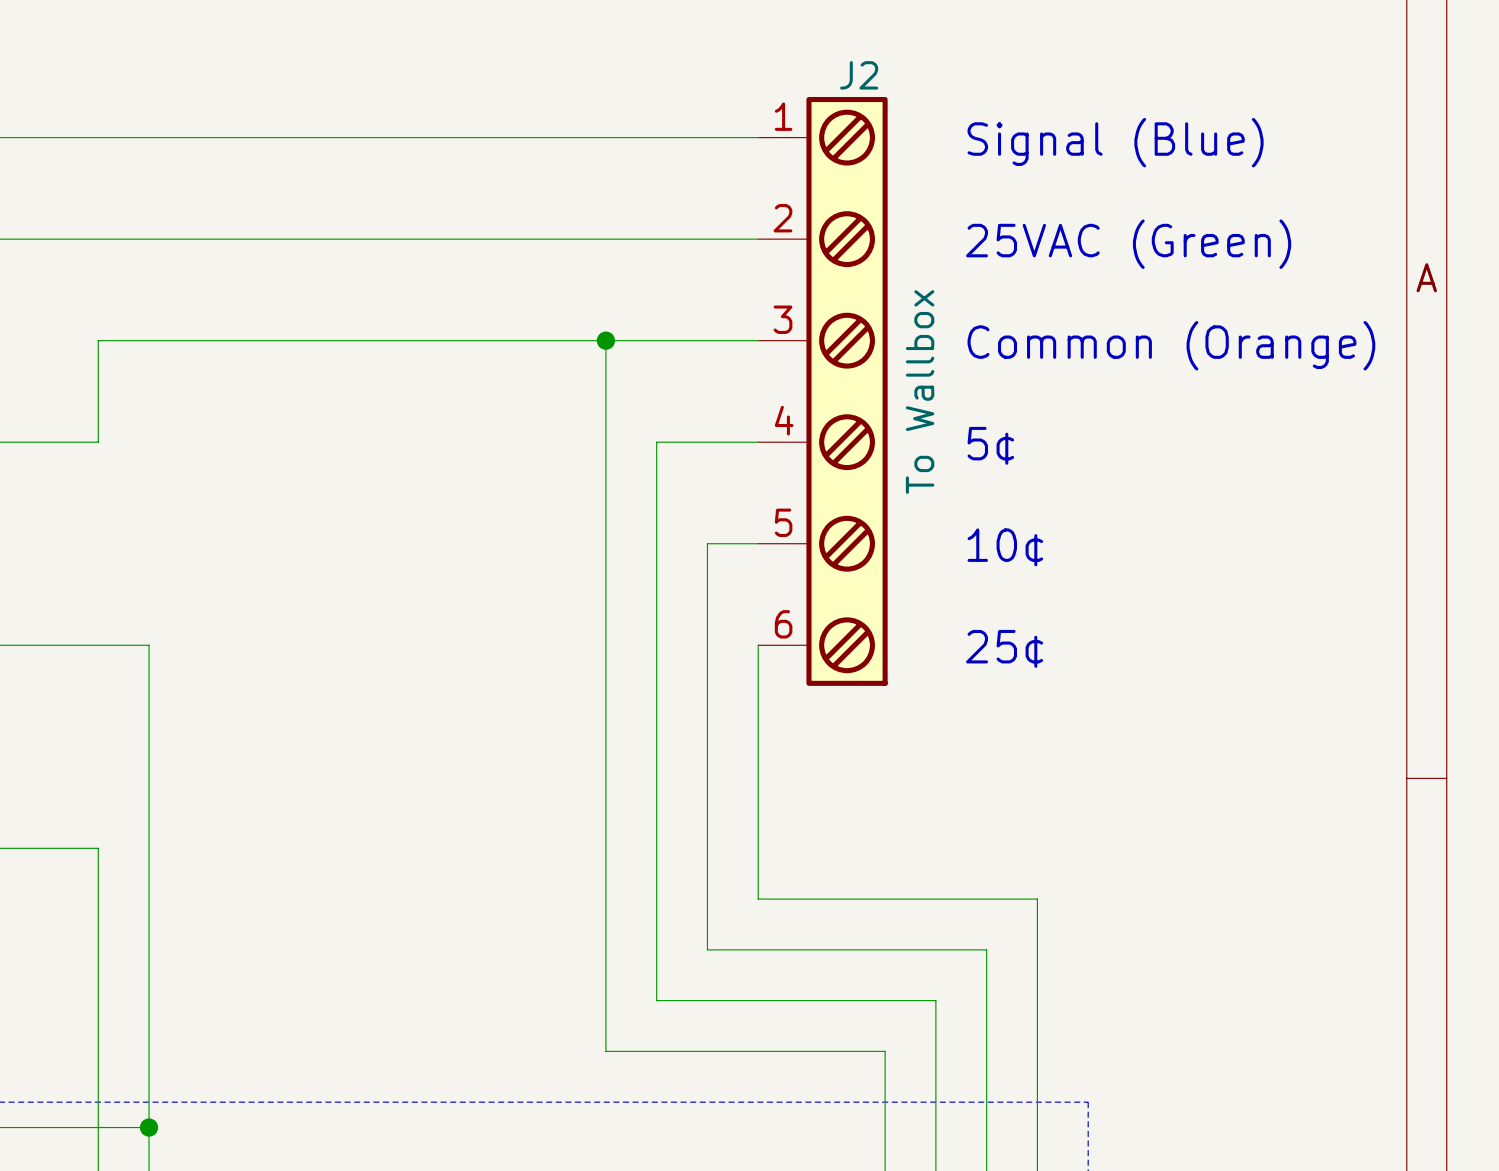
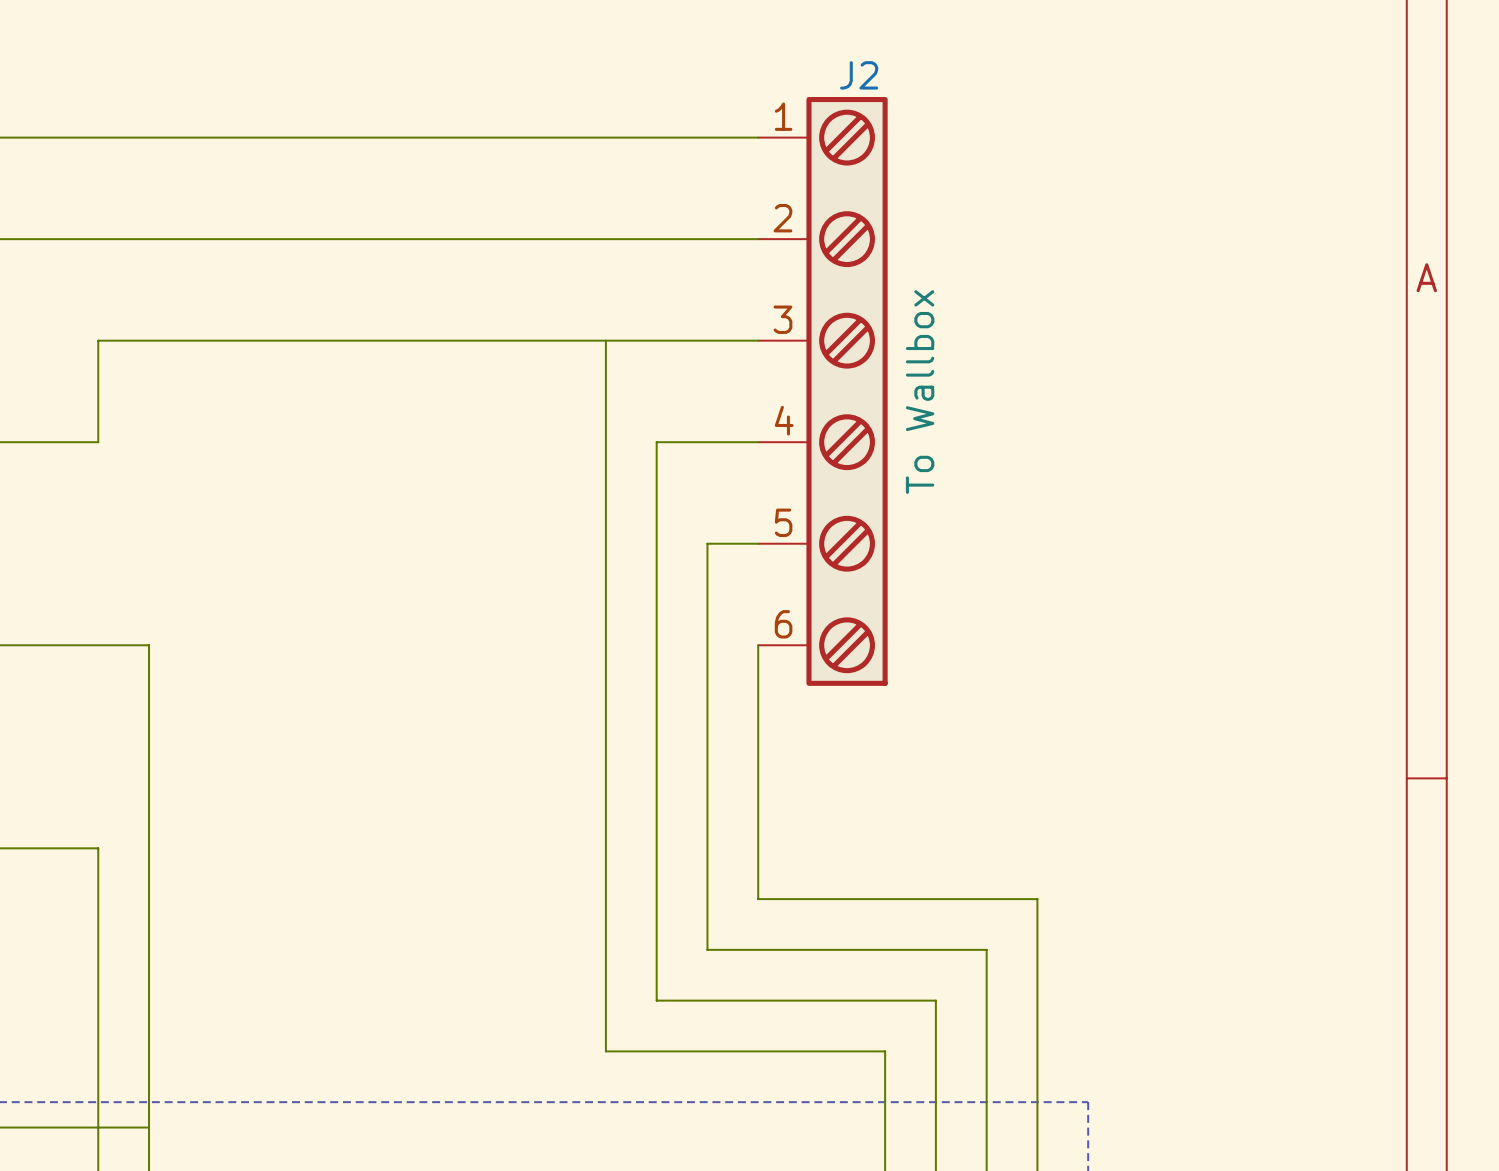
text: Signal (Blue) (1115, 142) -> none
text: 25VAC (Green) (1128, 244) -> none
junction: (605, 340) -> none
text: Common (Orange) (1171, 345) -> none
text: 5¢ (990, 445) -> none
text: 10¢ (1005, 547) -> none
text: 25¢ (1004, 648) -> none
junction: (149, 1127) -> none

